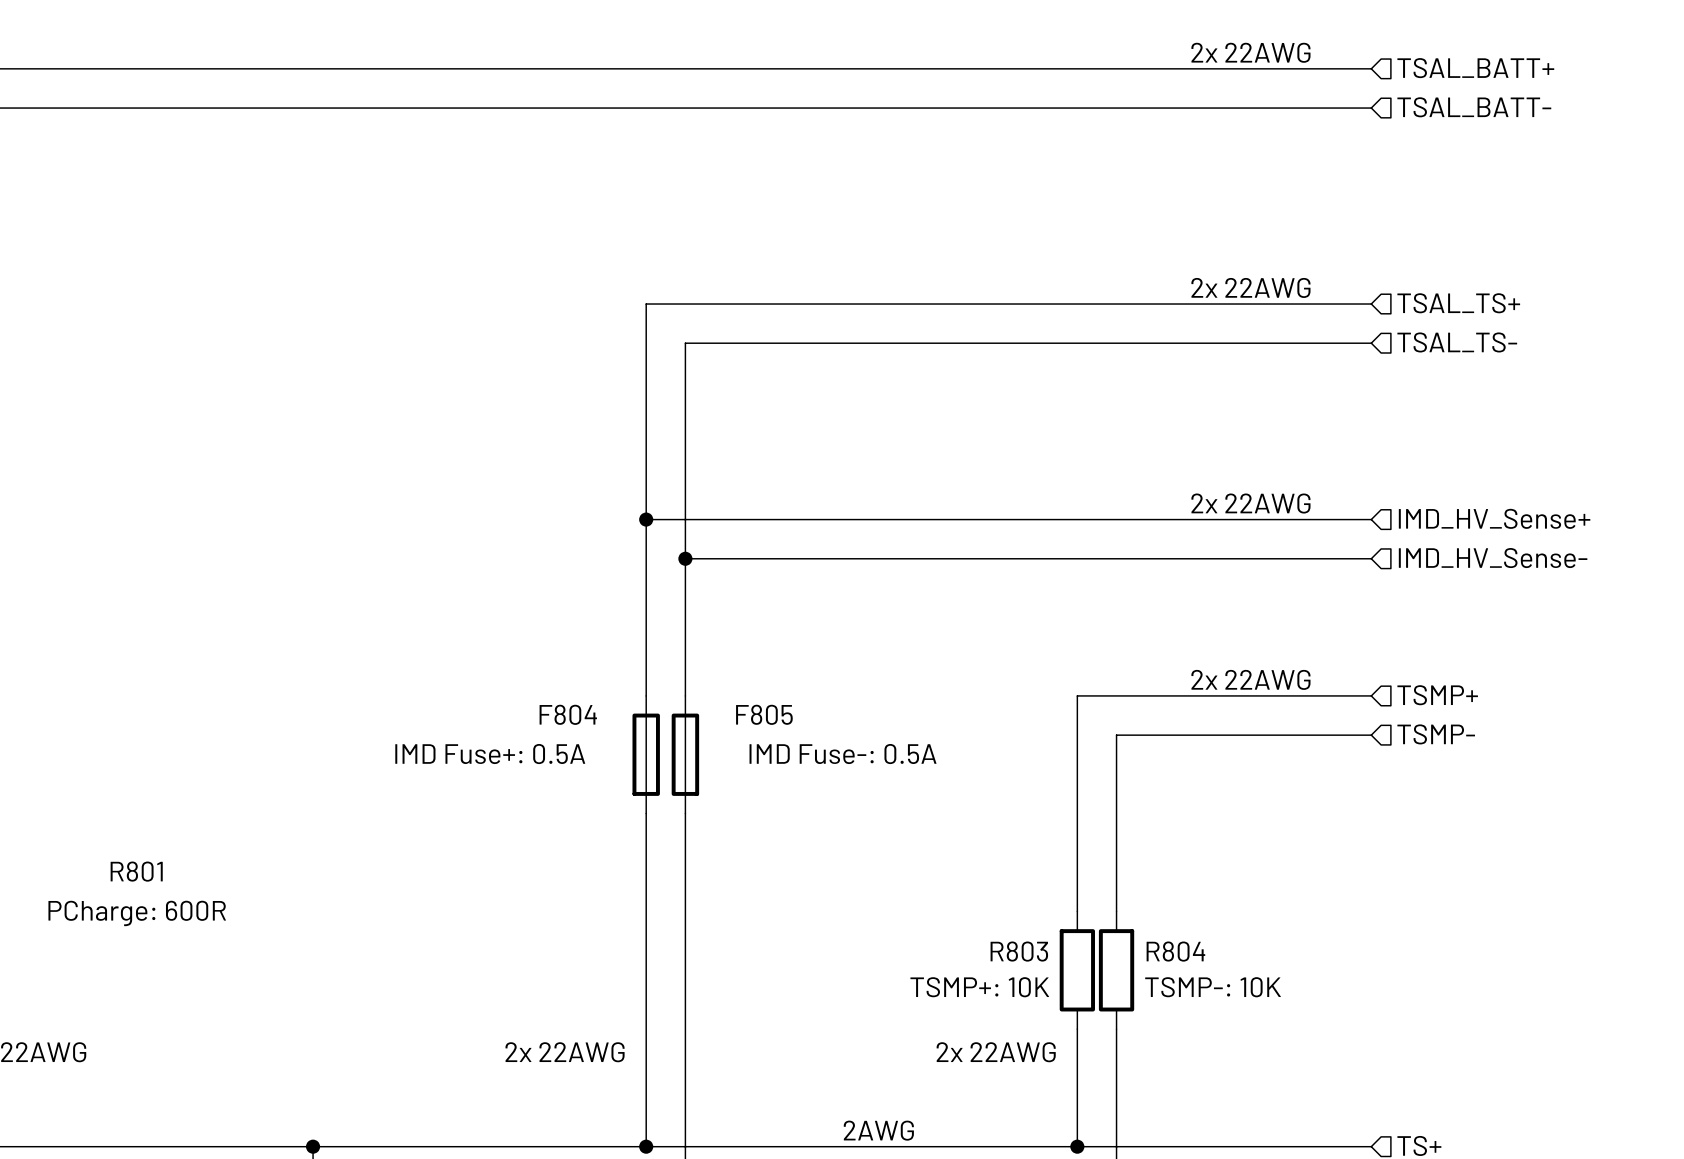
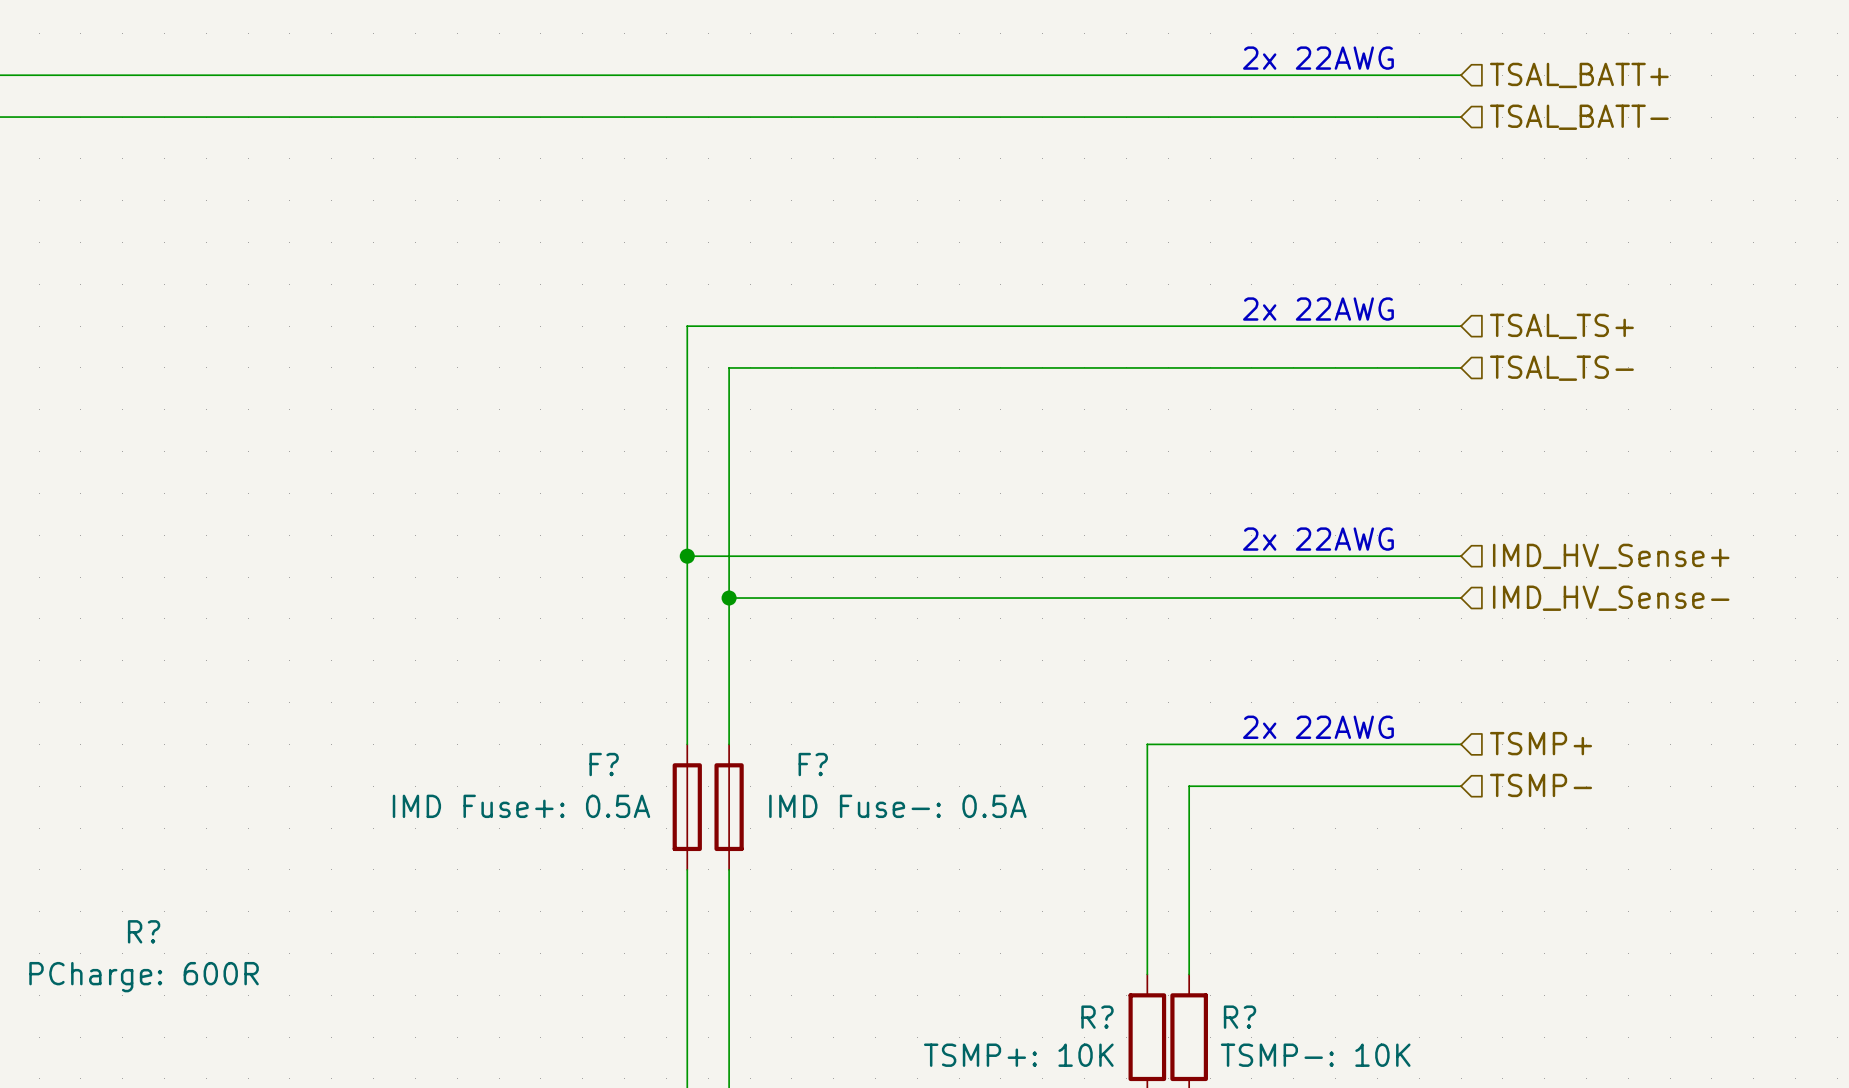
F804 name: F804 (568, 714) -> F? (604, 764)
F805 name: F805 (764, 714) -> F? (813, 764)
R801 name: R801 (136, 871) -> R? (144, 931)
R803 name: R803 (1019, 951) -> R? (1097, 1017)
R804 name: R804 (1175, 951) -> R? (1240, 1017)

